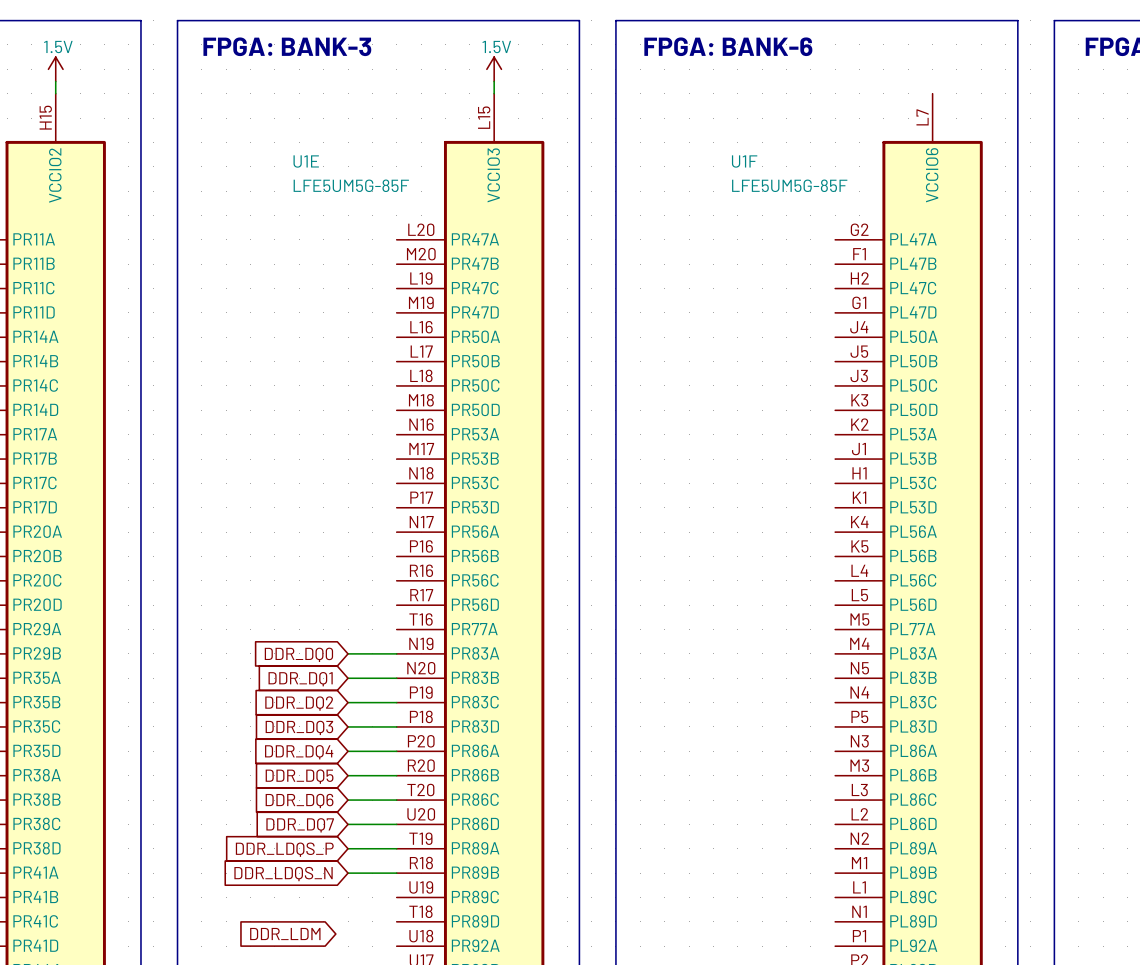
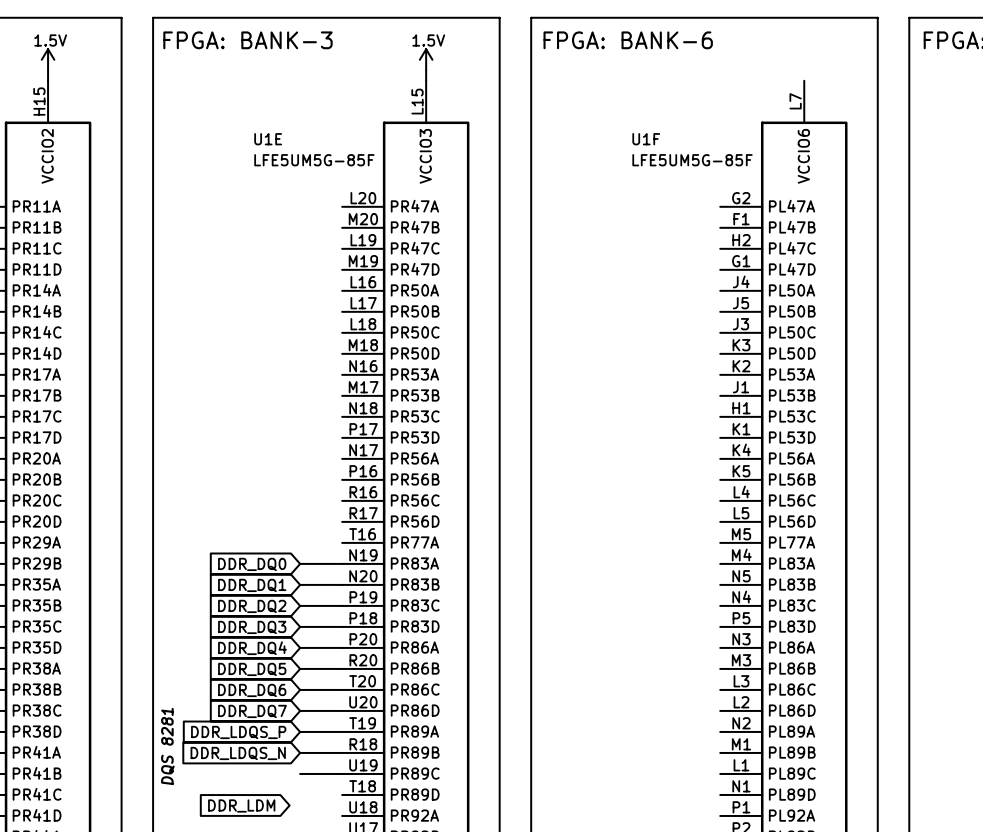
text: none -> DQS 8281 (167, 746)
wire: none -> (300, 773) (342, 773)

